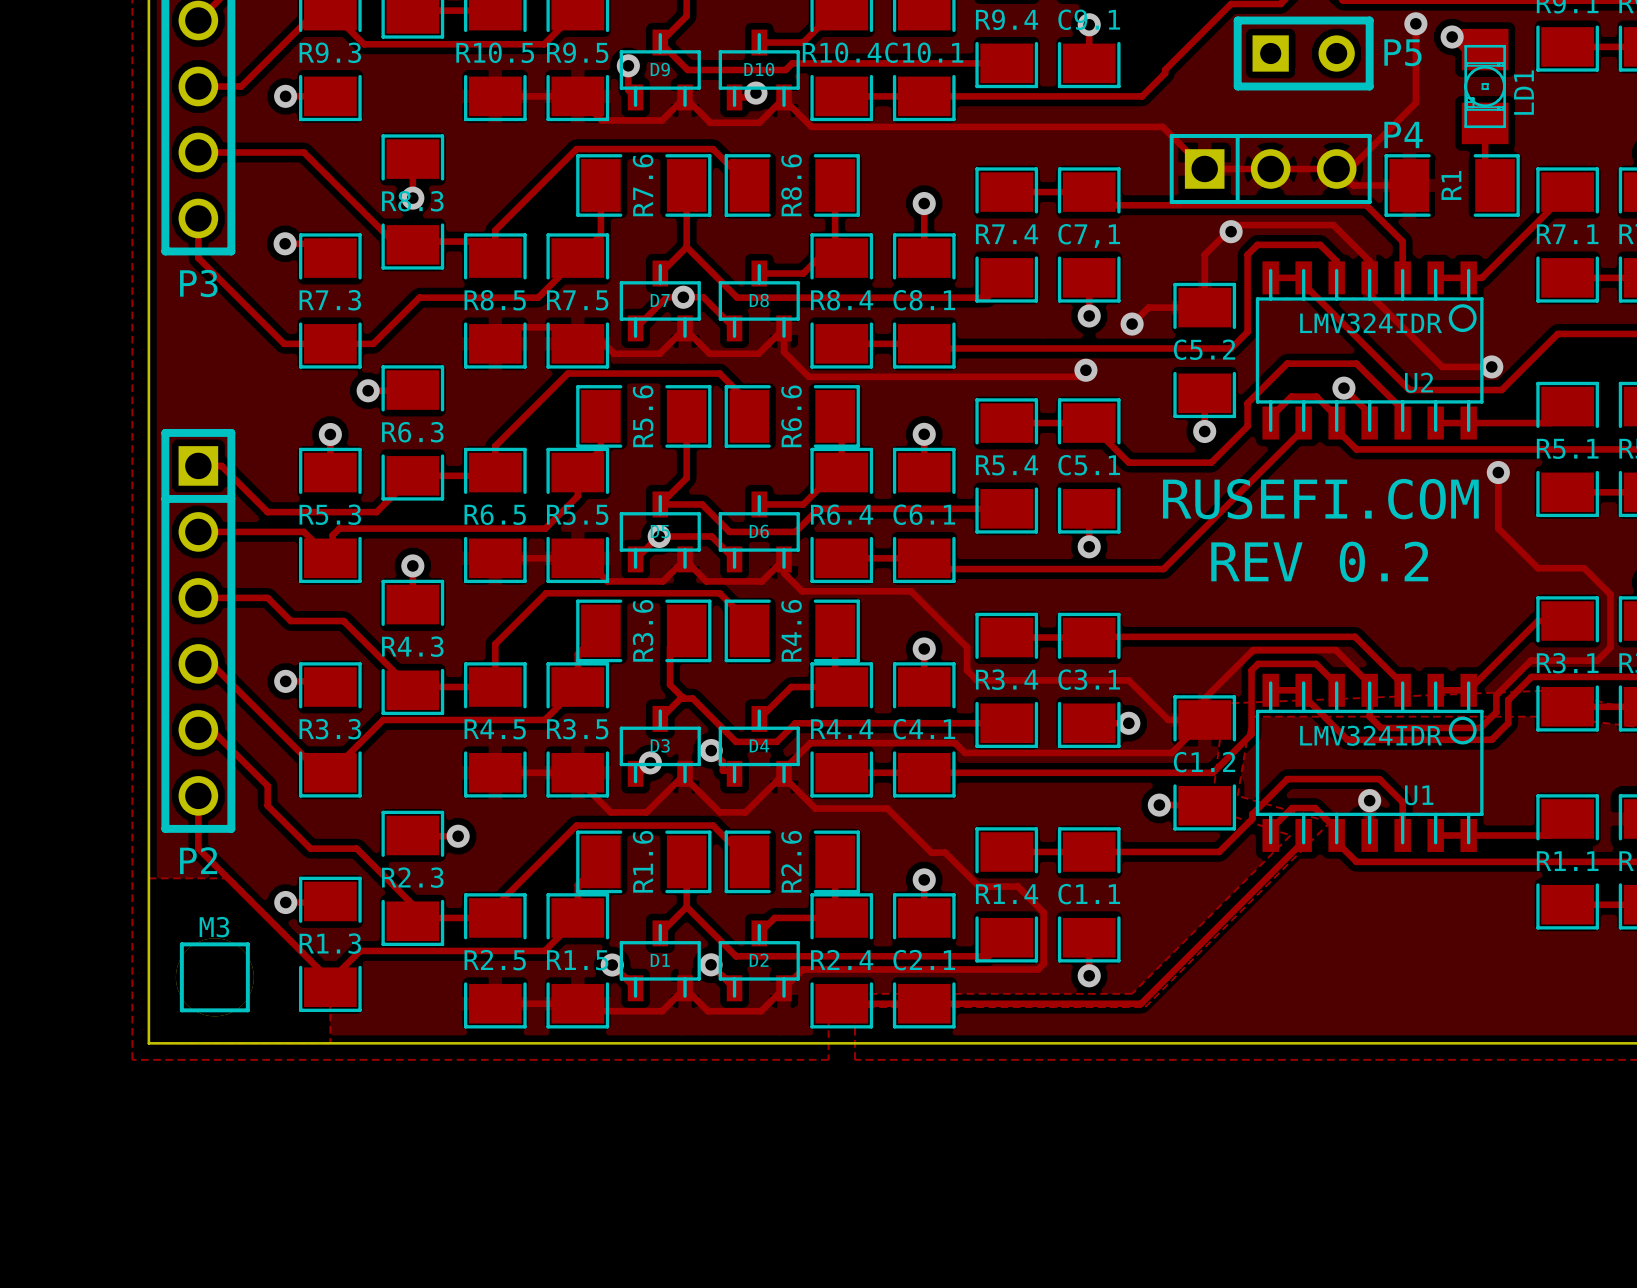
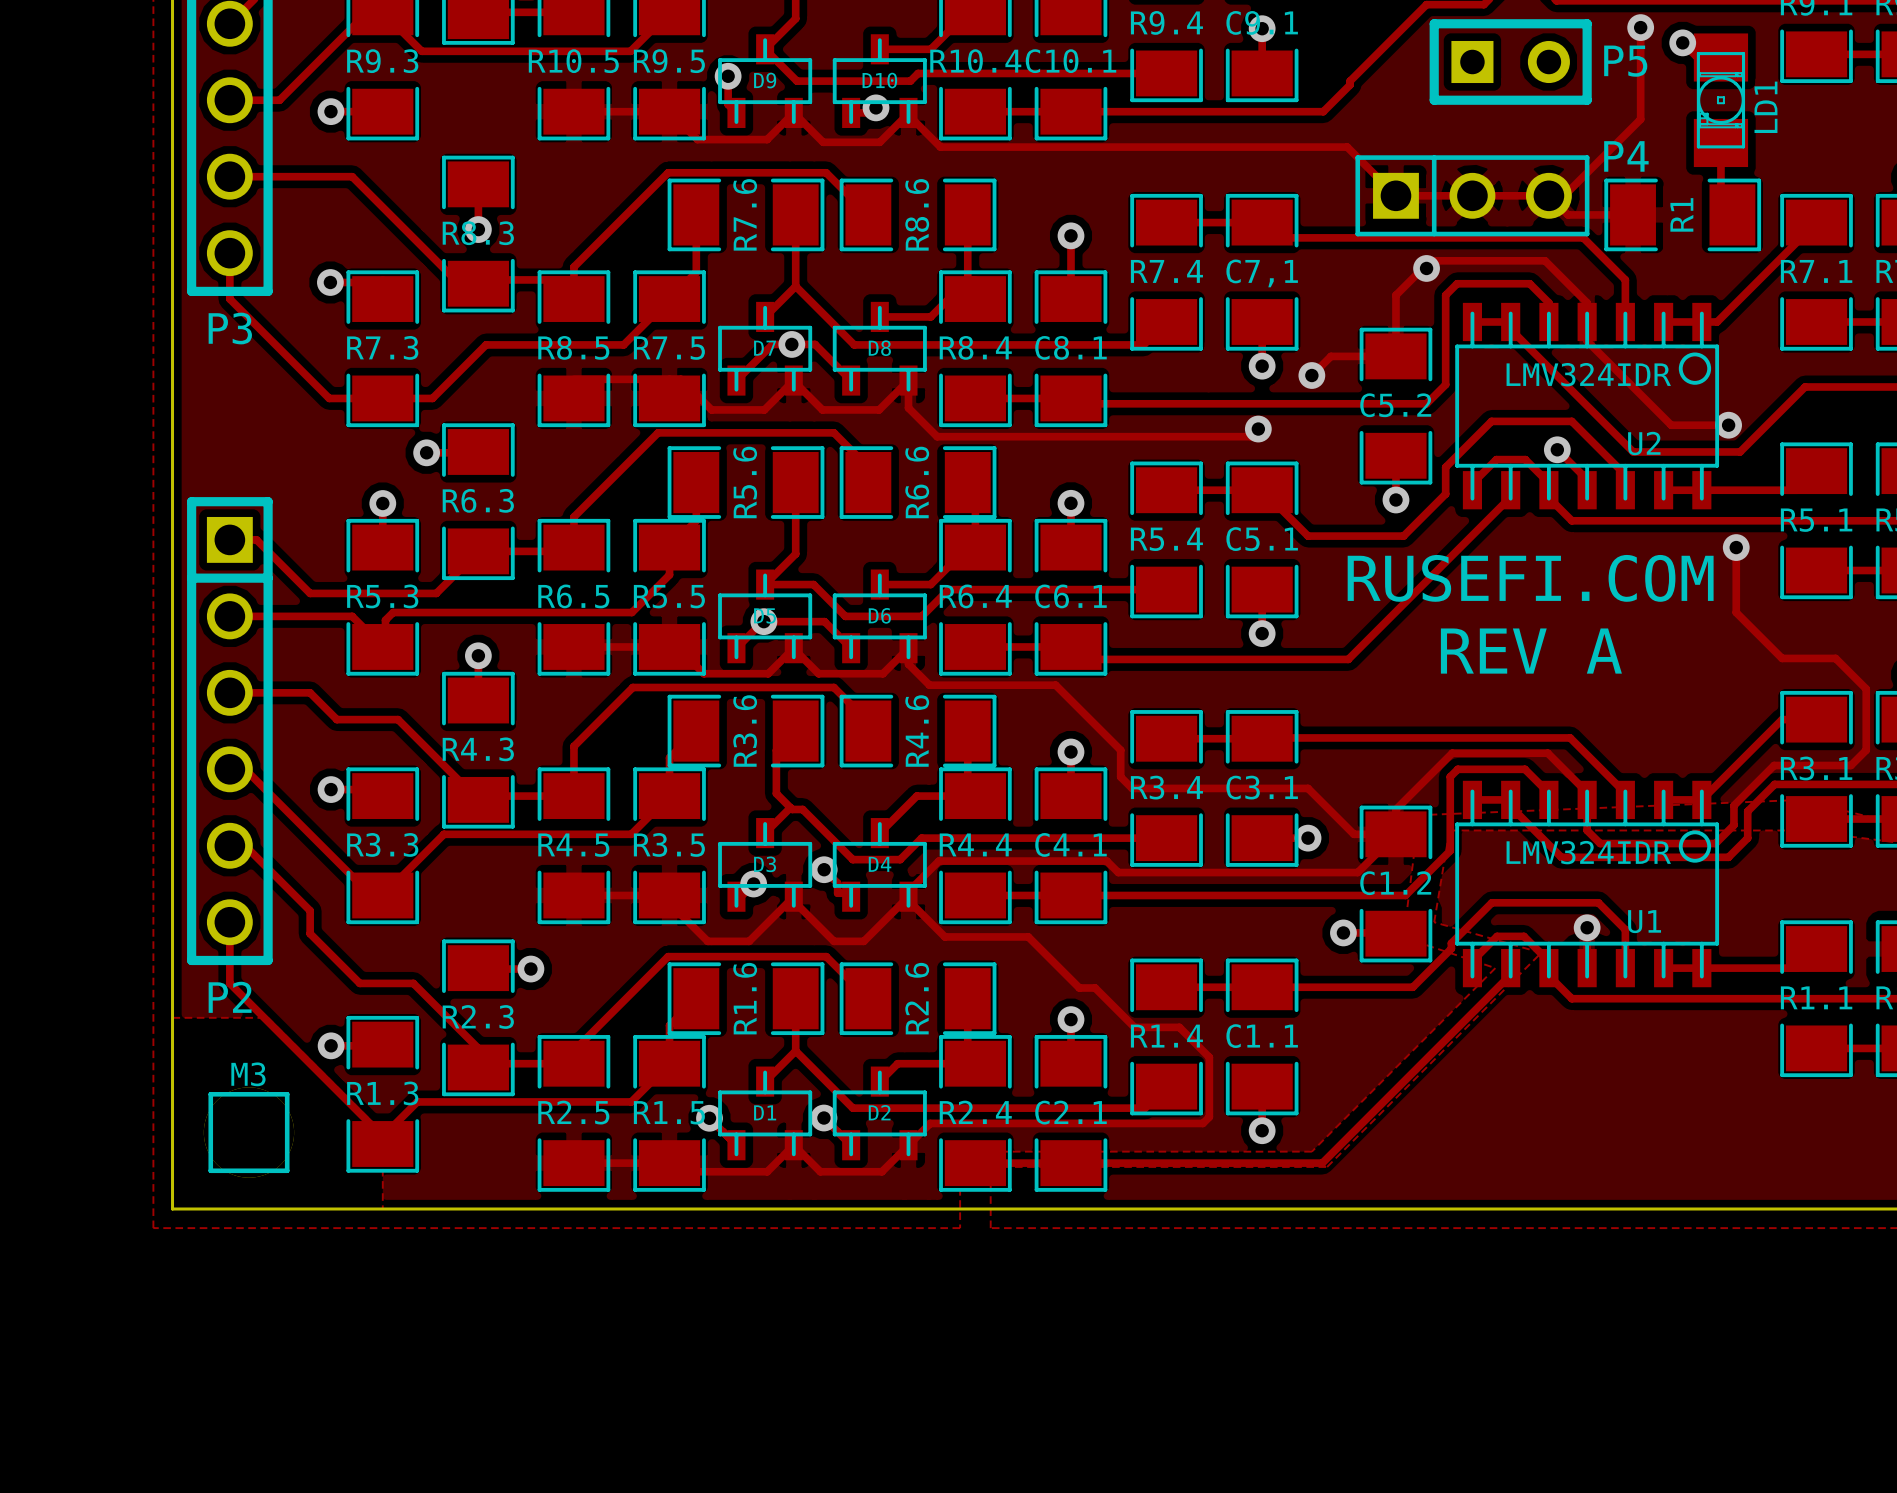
text: REV 0.2 (1319, 561) -> REV A (1531, 651)

